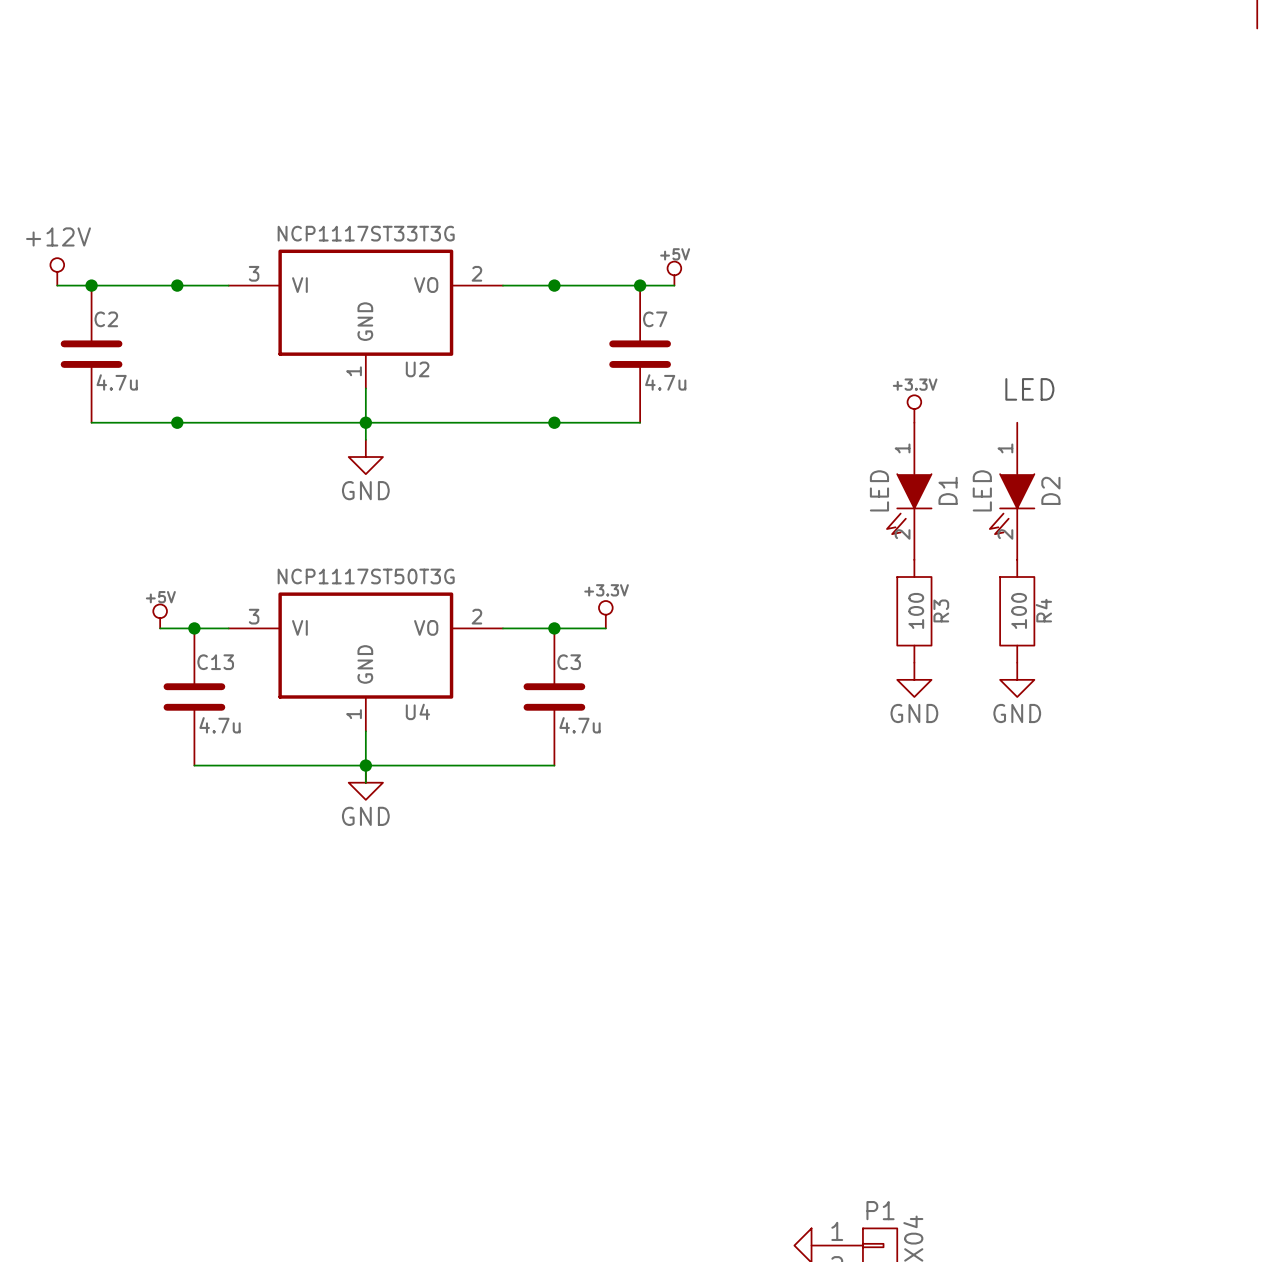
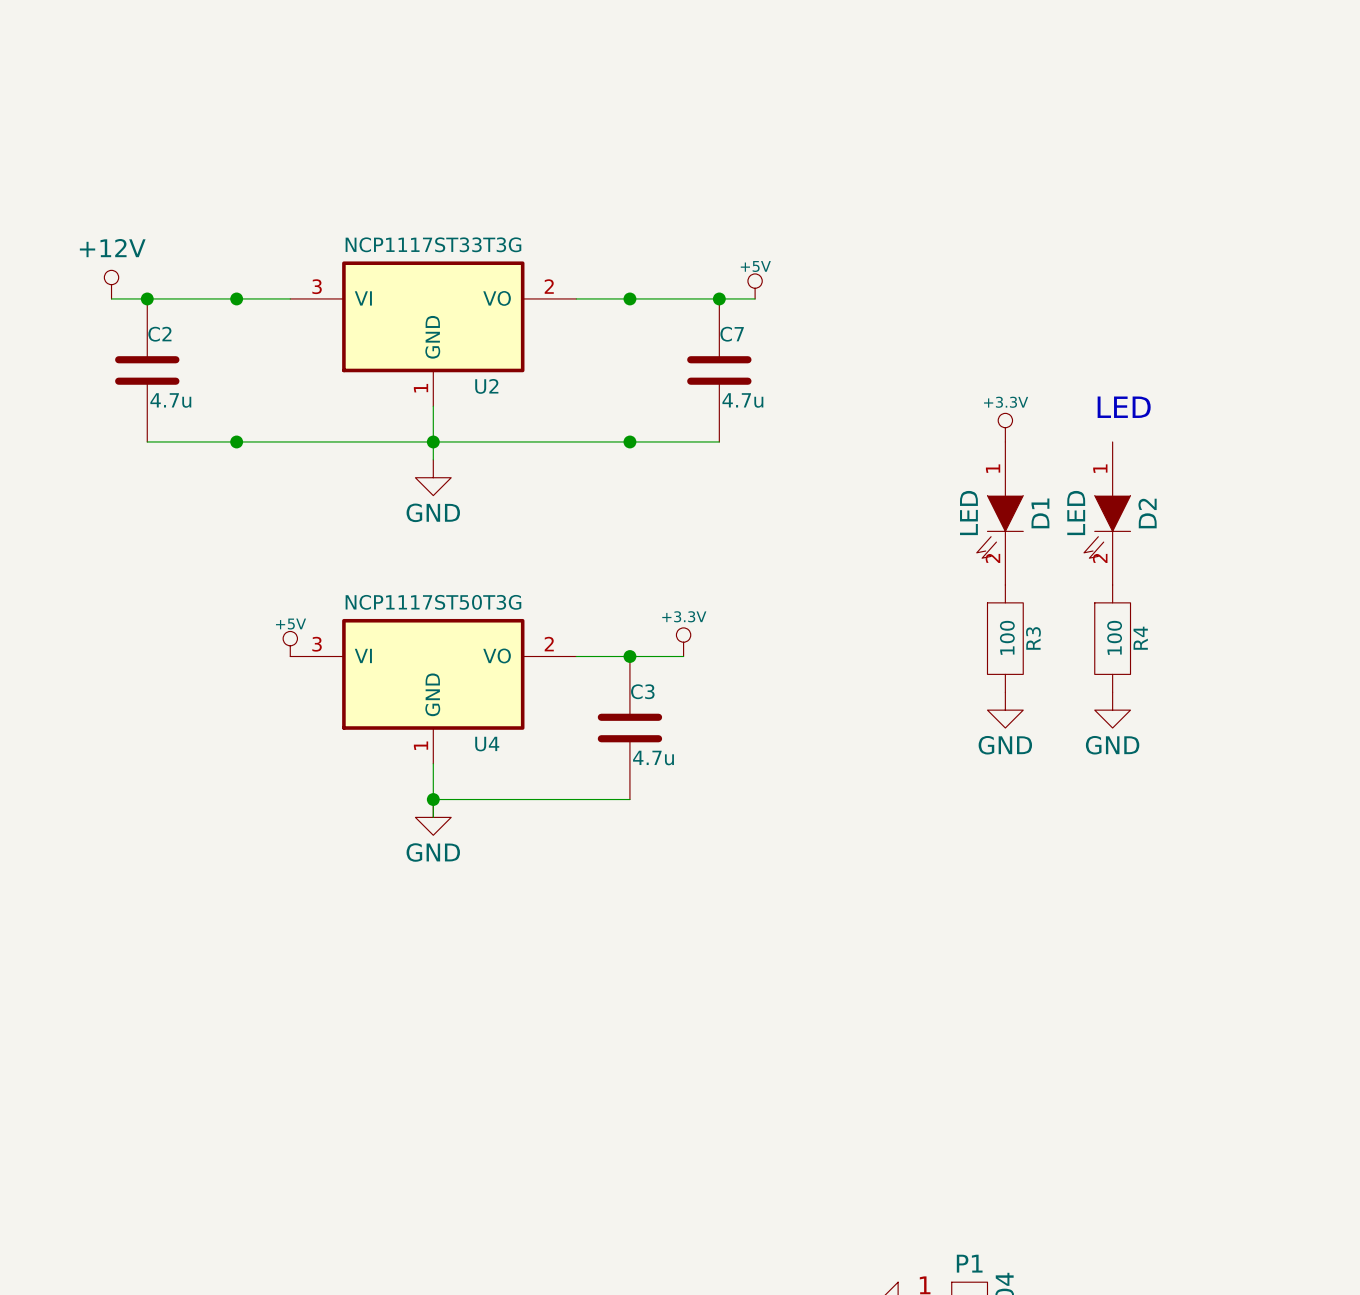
power symbol position: +5V (160, 616) -> +5V (290, 643)
wire: (160, 628) (228, 628) -> none
junction: (194, 628) -> none
C13: 4.7u (194, 696) -> none
wire: (194, 765) (365, 765) -> none

